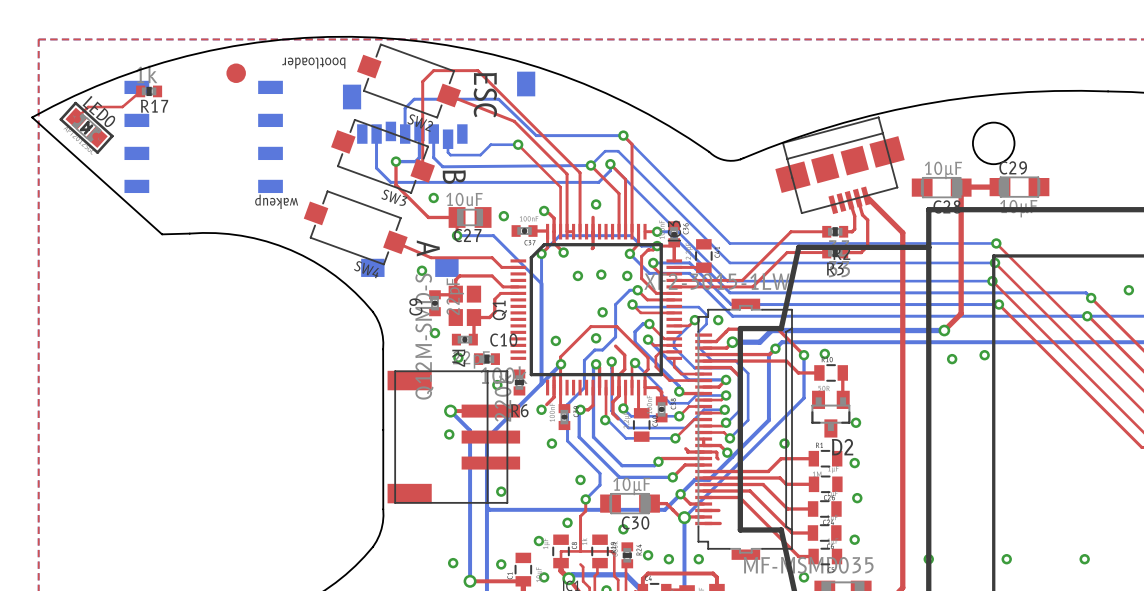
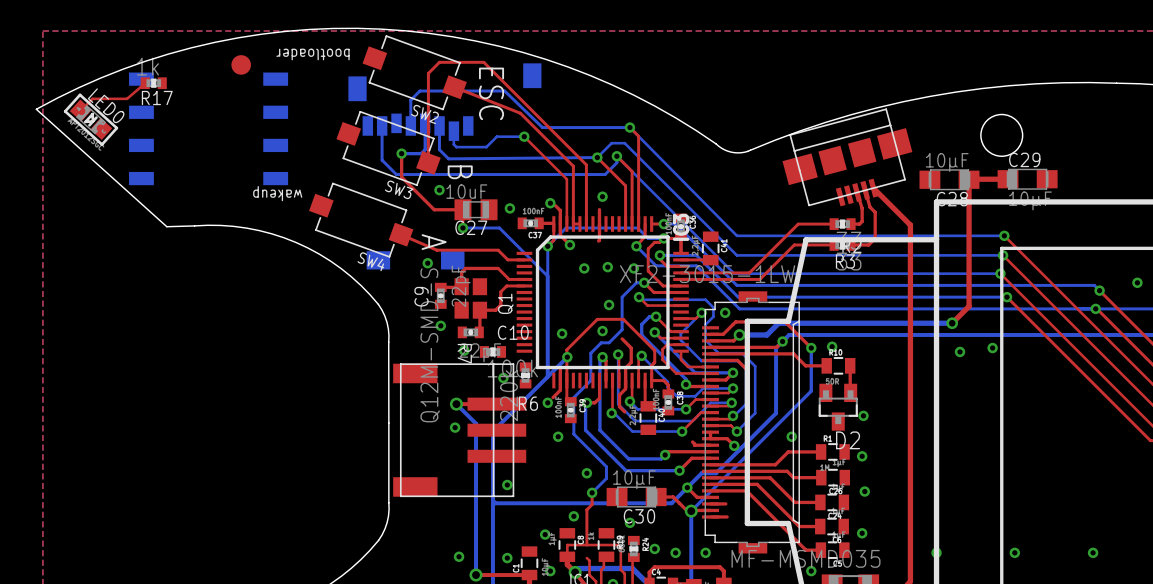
top track: (699, 452) (716, 452) (718, 459) -> none

